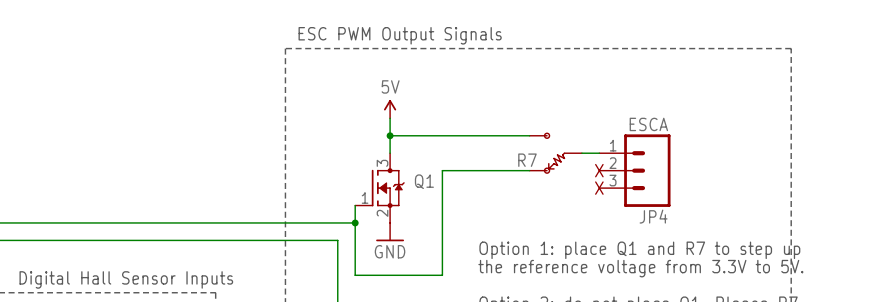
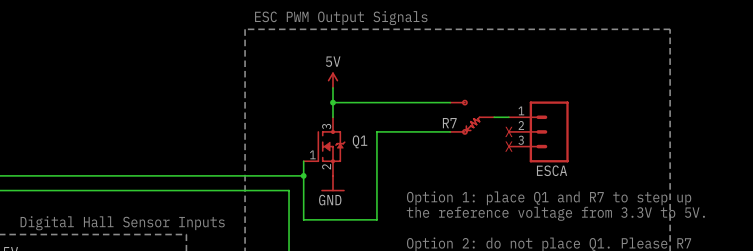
JP4 value: ESCA (648, 124) -> none
JP4 name: JP4 (653, 216) -> ESCA (552, 170)

